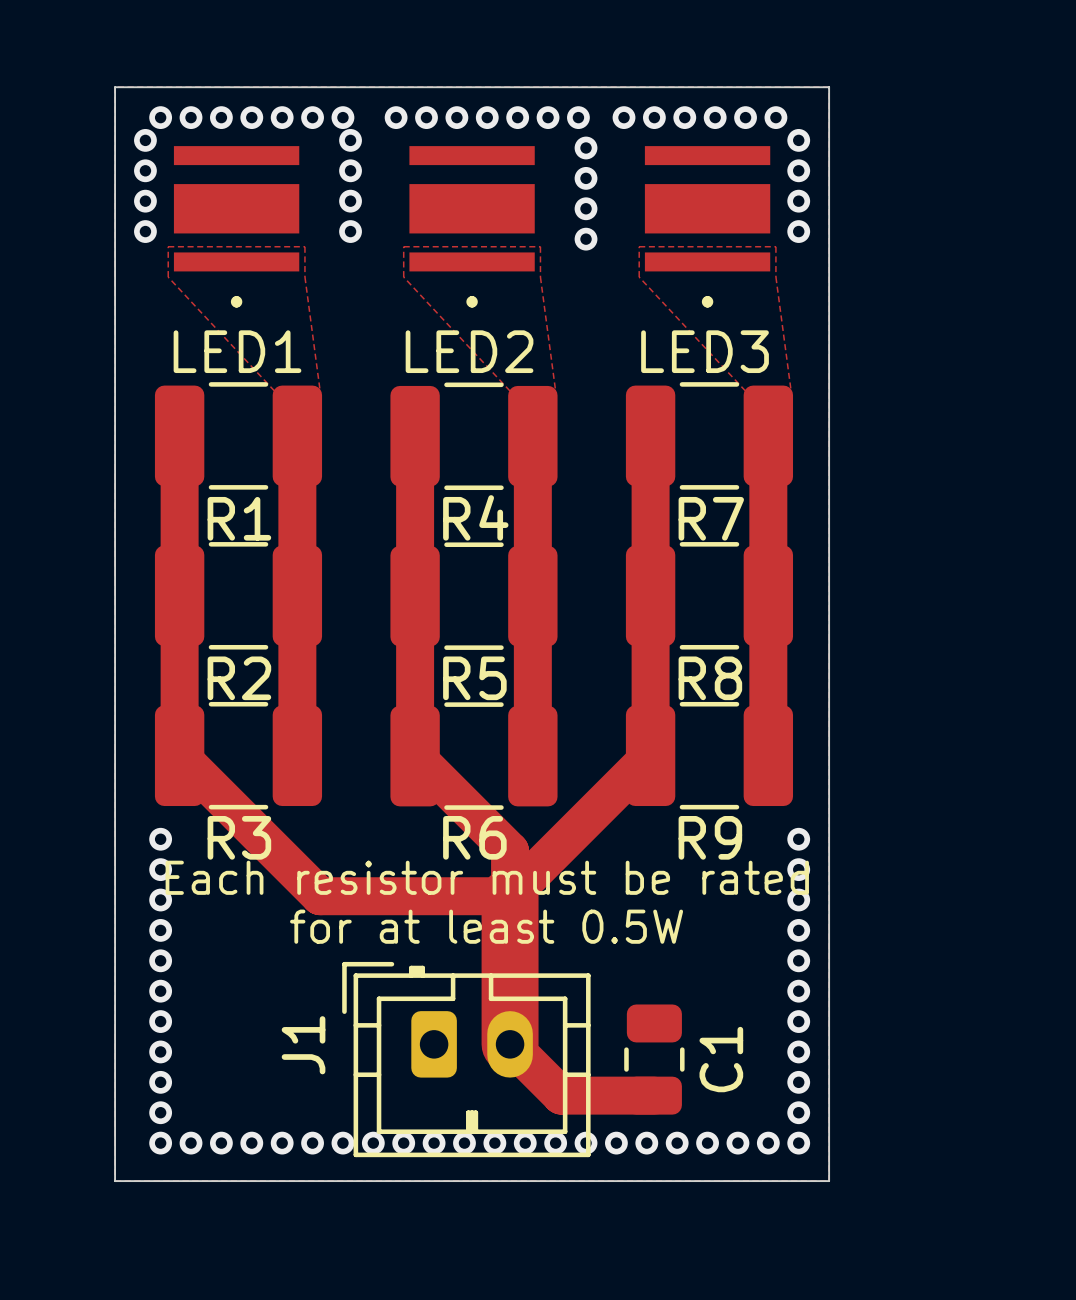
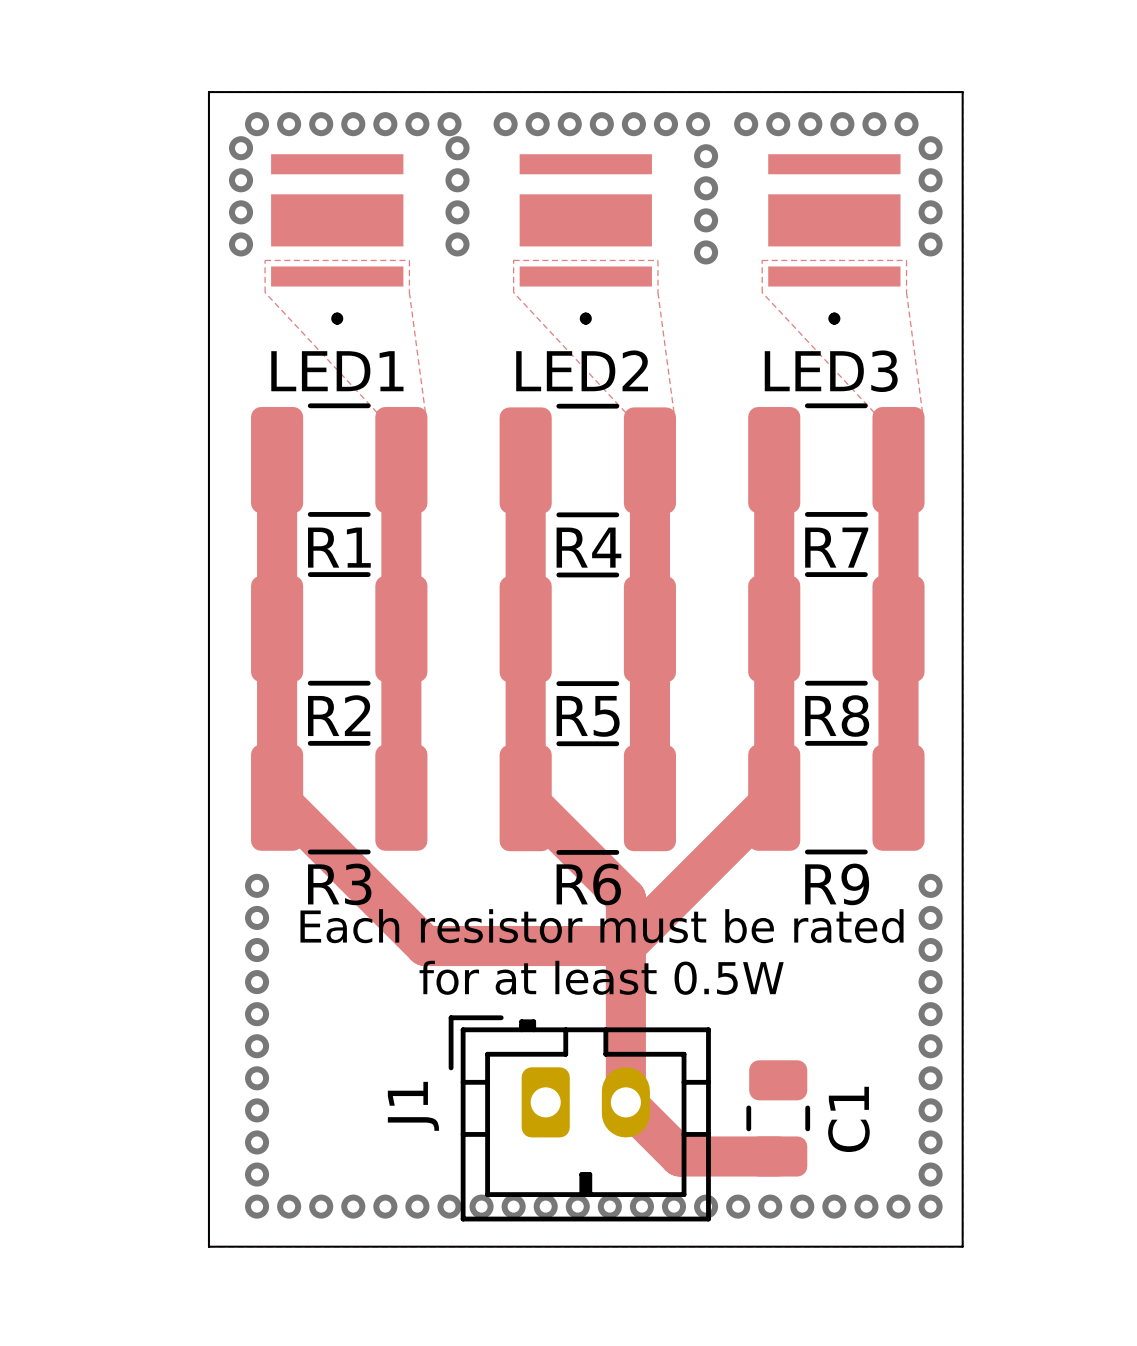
top track width: thick (510, 896) (510, 1044) -> thin (625, 946) (625, 1102)

